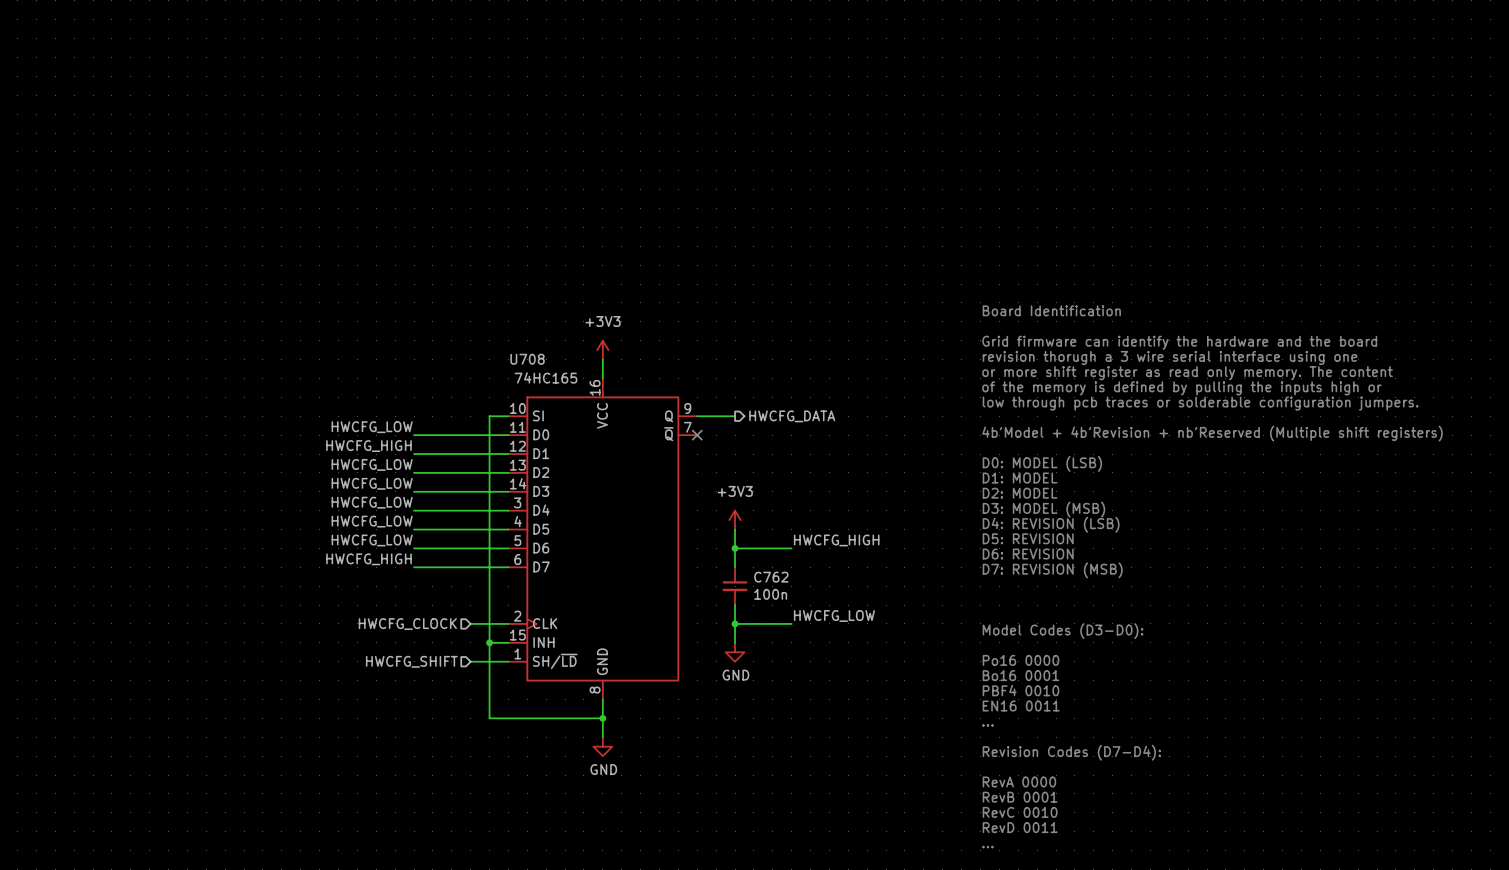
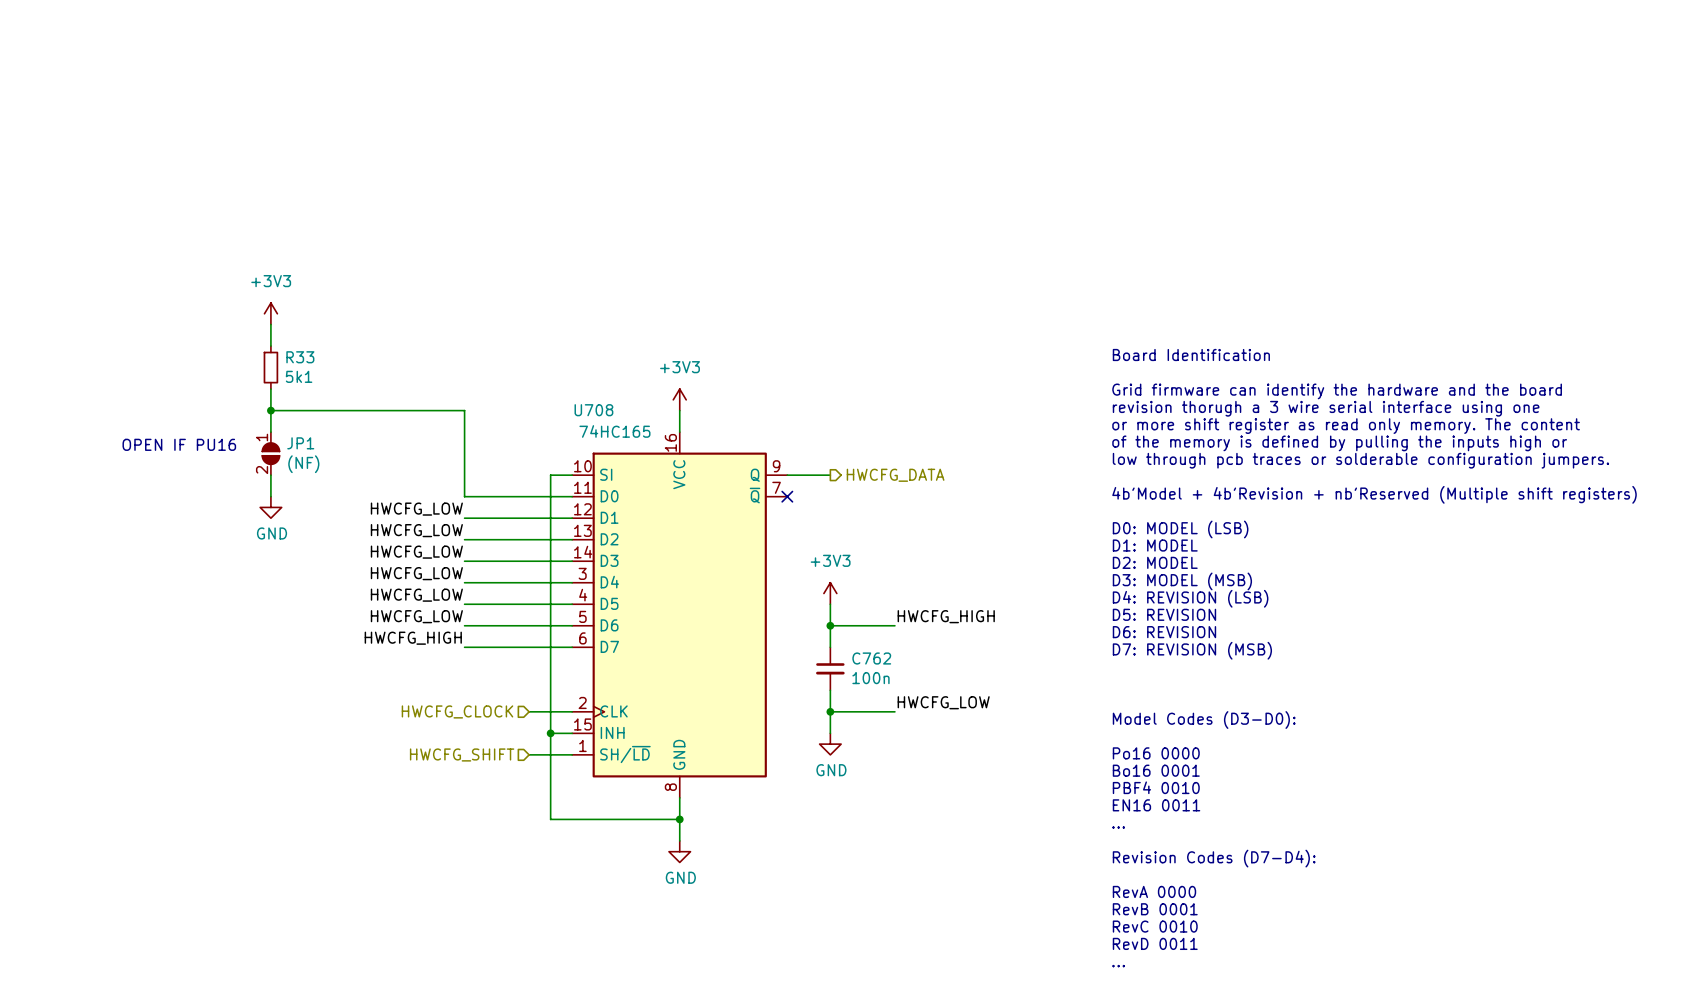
power symbol: none -> +3V3 (270, 313)
wire: none -> (270, 324) (270, 346)
R33: none -> 5k1 (270, 367)
wire: none -> (270, 389) (270, 432)
wire: none -> (270, 410) (464, 410) (464, 496)
junction: none -> (270, 410)
text: none -> OPEN IF PU16 (179, 444)
JP1: none -> (NF) (270, 453)
wire: none -> (270, 475) (270, 496)
label: HWCFG_LOW (372, 427) -> none
power symbol: none -> GND (270, 507)
label: HWCFG_HIGH (369, 446) -> HWCFG_LOW (416, 509)

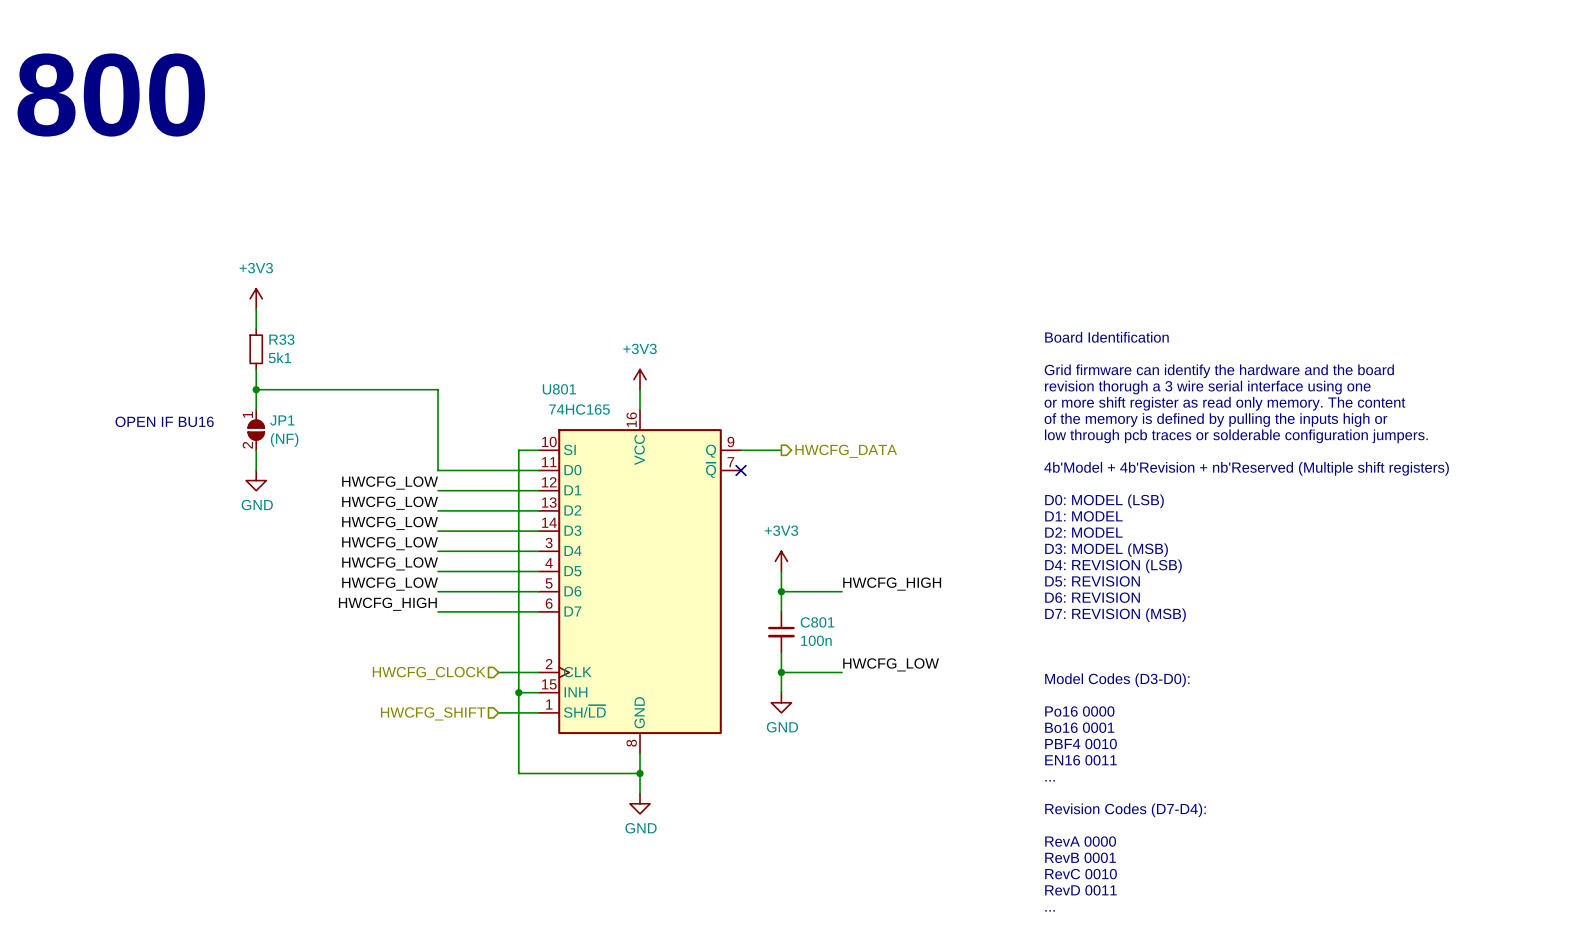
text: none -> 800 (111, 95)
U708 name: U708 (593, 410) -> U801 (559, 389)
text: OPEN IF PU16 (179, 444) -> OPEN IF BU16 (164, 421)
C762 name: C762 (871, 658) -> C801 (817, 622)

